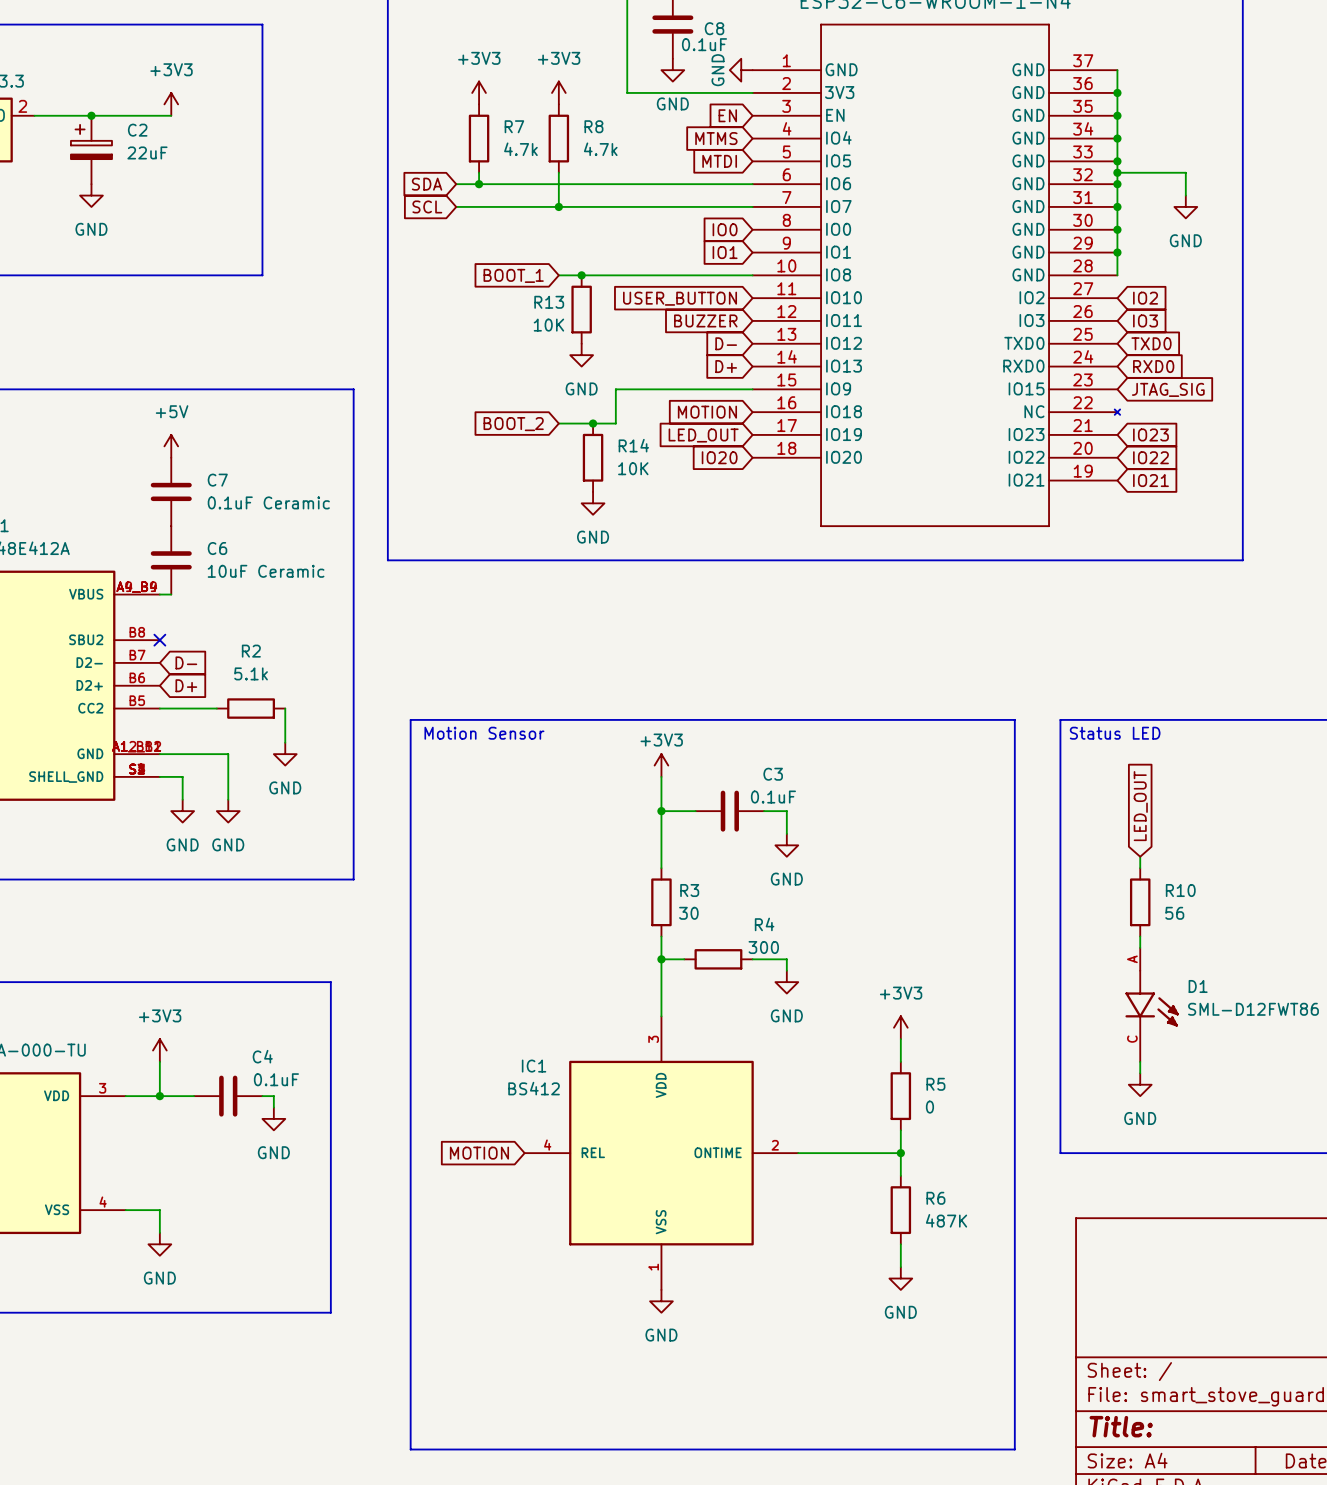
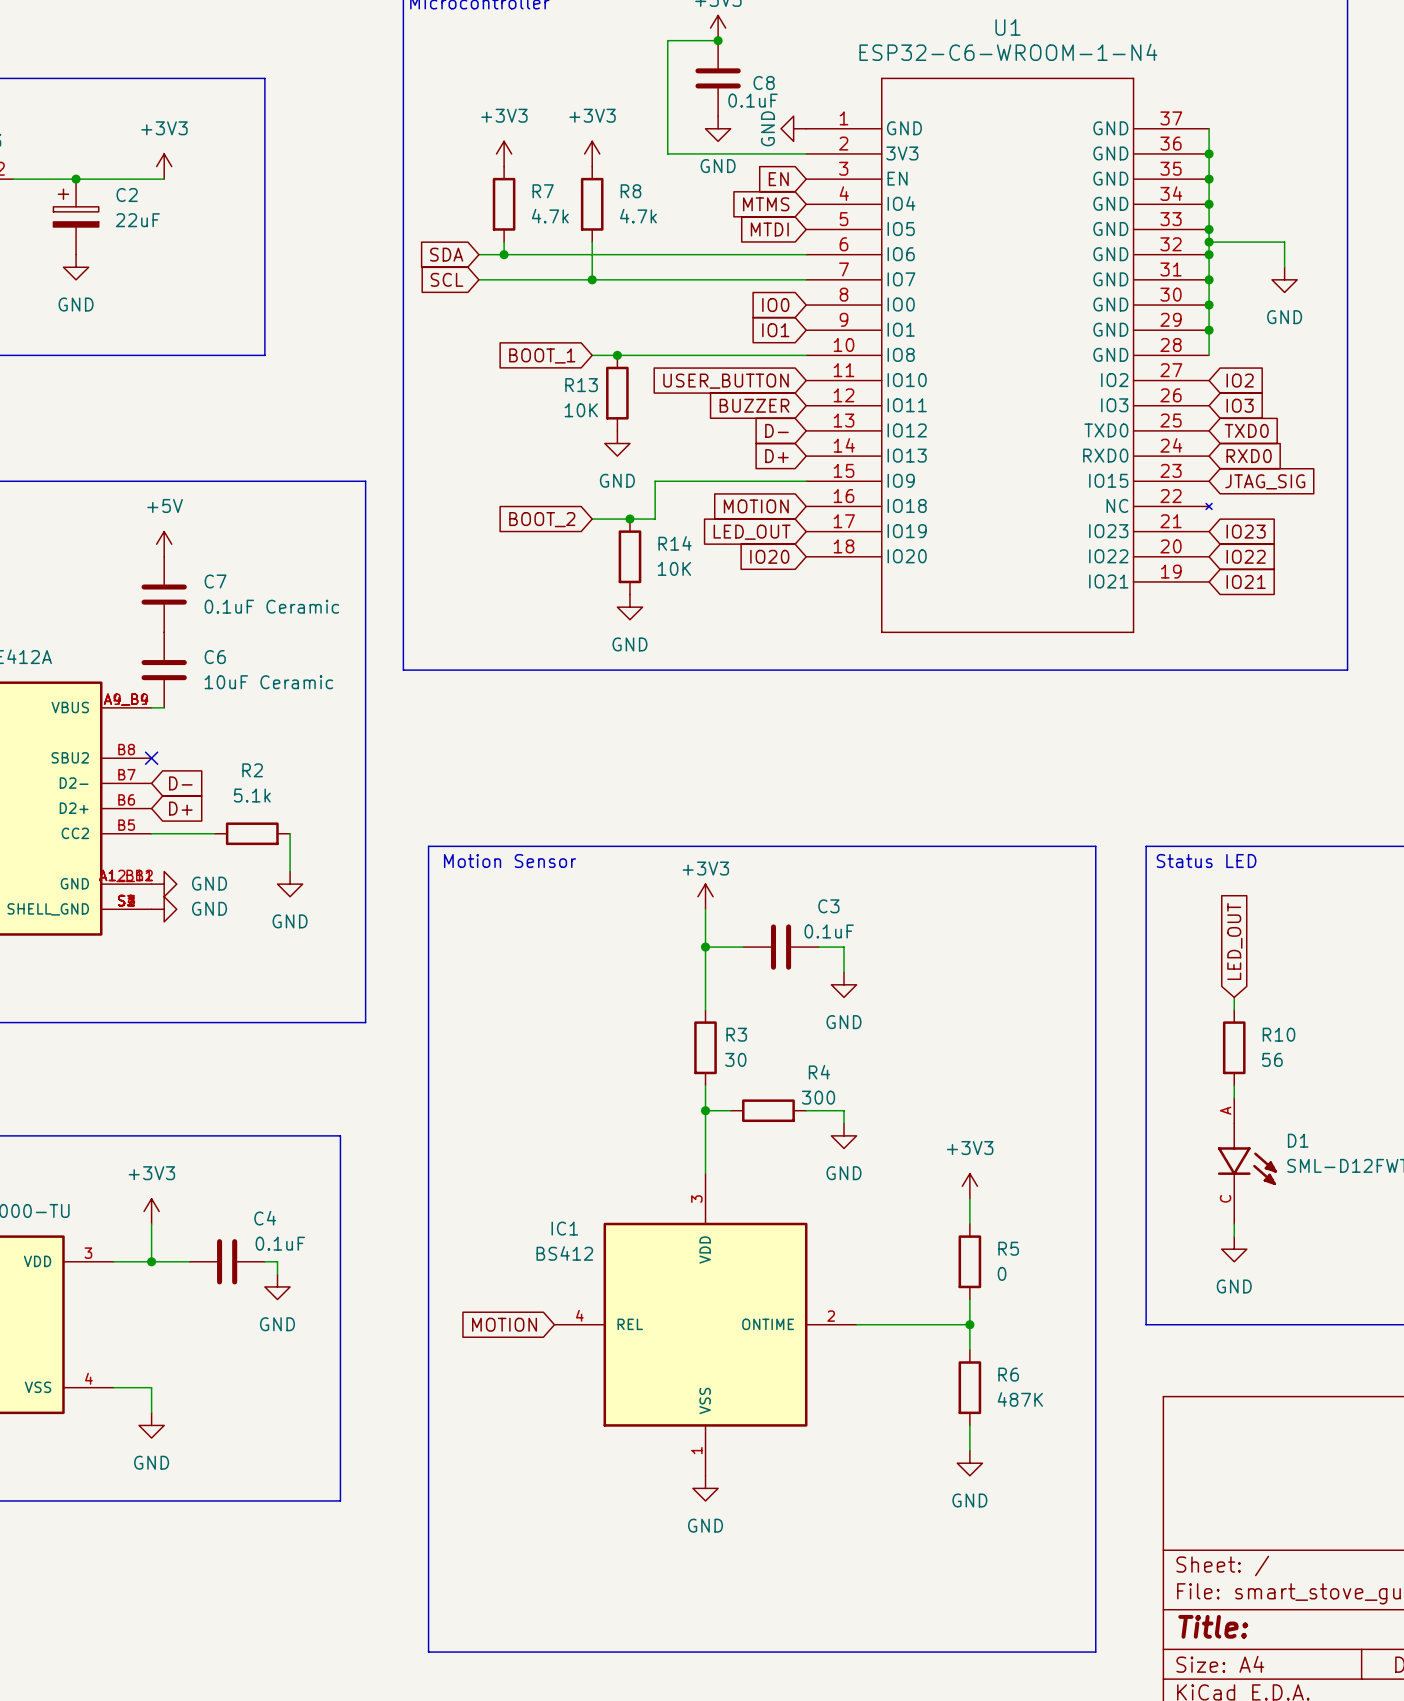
wire: (159, 754) (228, 754) (228, 799) -> none
power symbol: none -> GND (164, 884)
wire: (159, 776) (182, 776) (182, 799) -> none
power symbol: none -> GND (164, 909)
power symbol: GND (182, 811) -> none
power symbol: GND (228, 811) -> none

